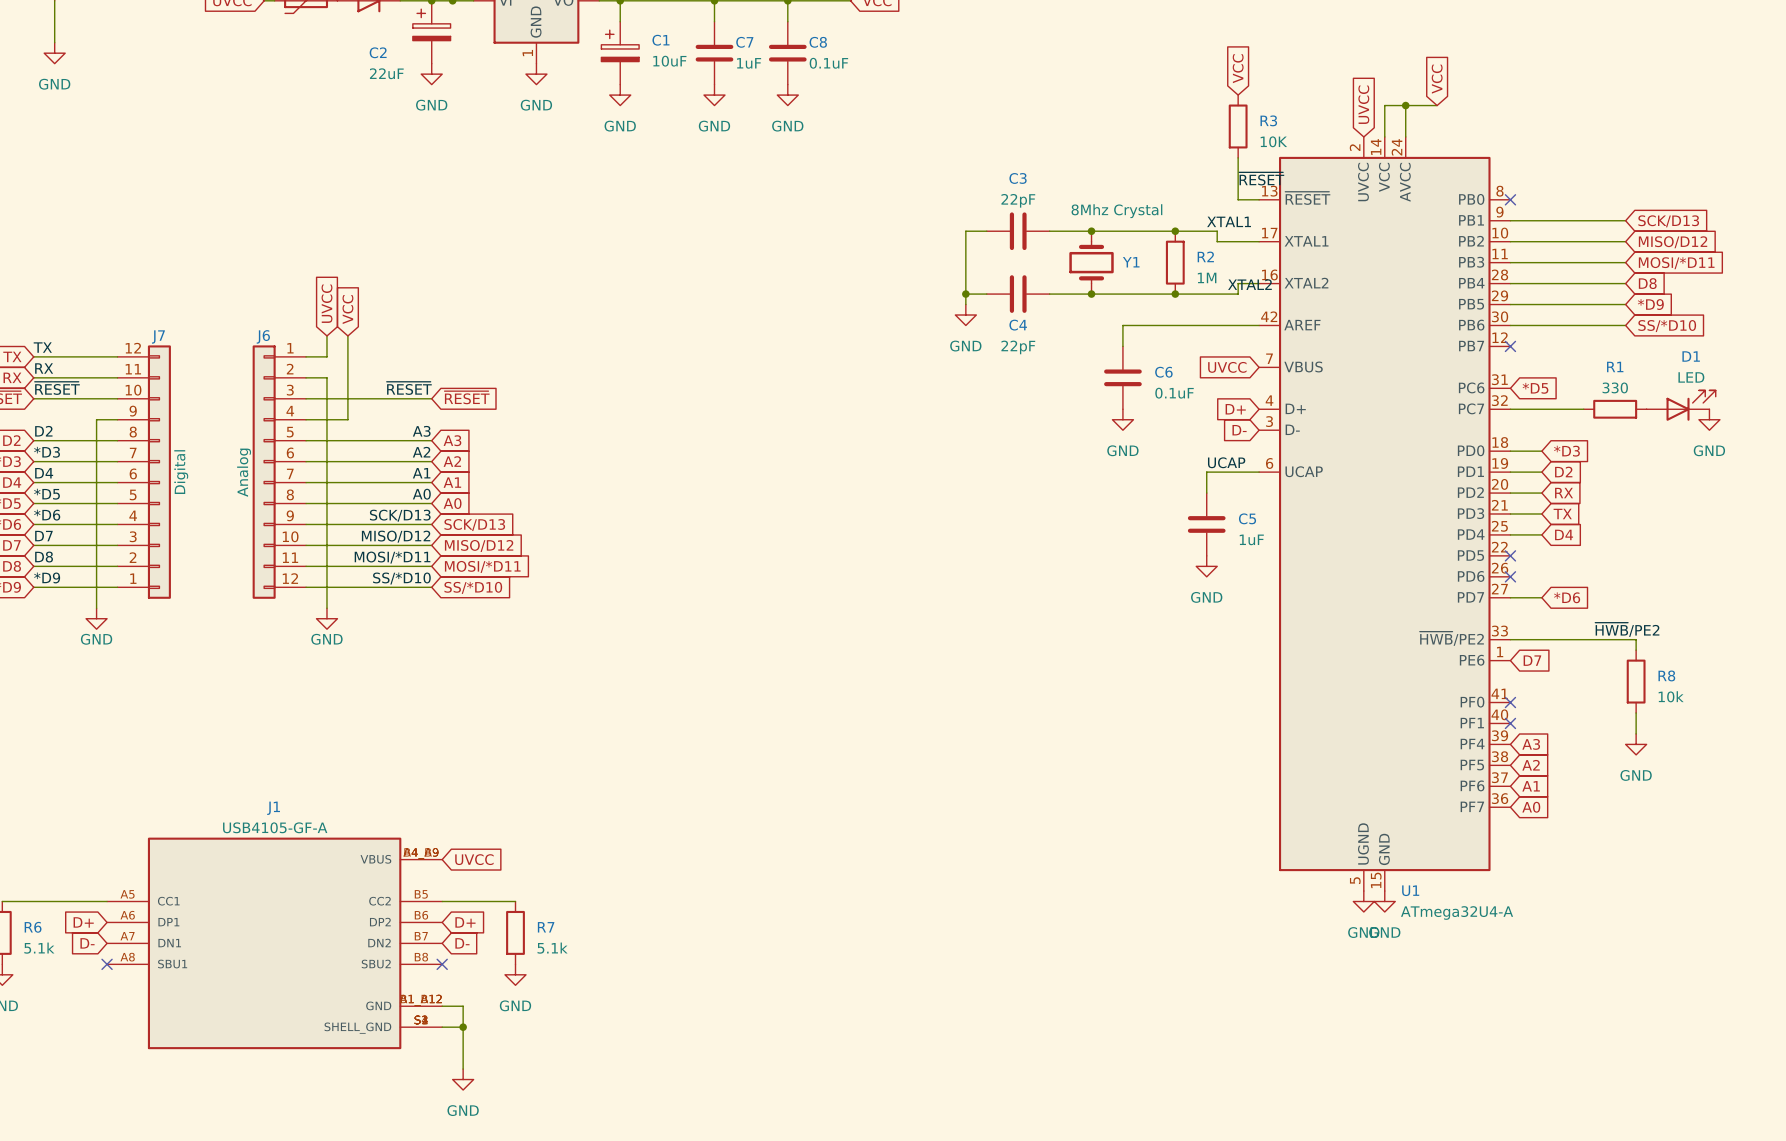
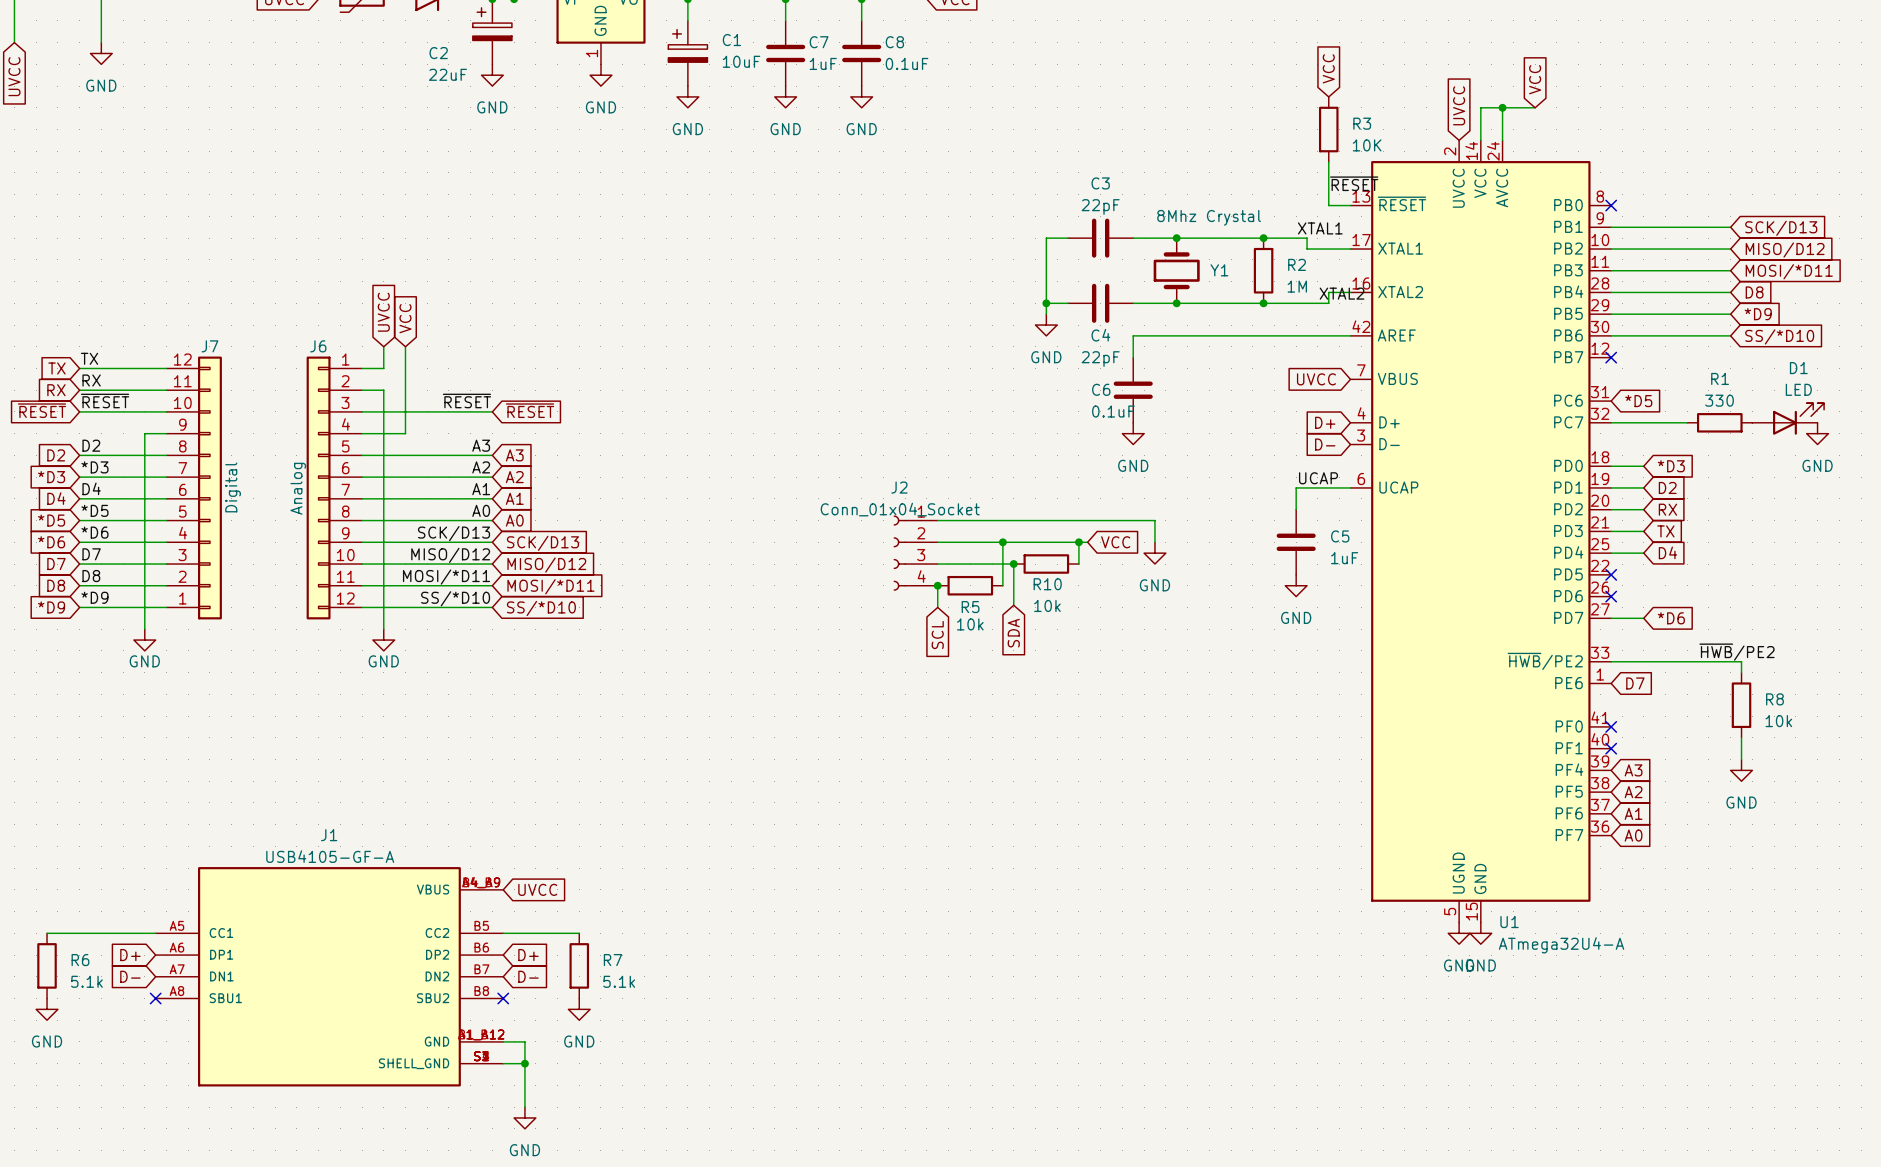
wire: (1122, 325) (1122, 346) -> (1209, 335) (1133, 335) (1133, 357)
C6 name position: C6 (1163, 372) -> C6 (1101, 389)
C6 position: (1122, 377) -> (1133, 390)
C6 value position: 0.1uF (1174, 393) -> 0.1uF (1113, 411)
power symbol: none -> GND (1133, 433)
power symbol: GND (1122, 419) -> none
wire: none -> (937, 520) (1154, 520) (1154, 542)
wire: none -> (937, 542) (1087, 542)
wire: none -> (1002, 542) (1002, 585)
junction: none -> (1002, 542)
wire: none -> (1078, 542) (1078, 564)
junction: none -> (1078, 542)
global label: none -> VCC (1115, 542)
J2: none -> Conn_01x04_Socket (915, 553)
power symbol: none -> GND (1154, 553)
wire: none -> (937, 564) (1013, 564) (1013, 605)
junction: none -> (1013, 564)
R10: none -> 10k (1046, 564)
wire: none -> (937, 585) (937, 607)
junction: none -> (937, 585)
R5: none -> 10k (970, 585)
global label: none -> SDA (1013, 633)
global label: none -> SCL (937, 635)

